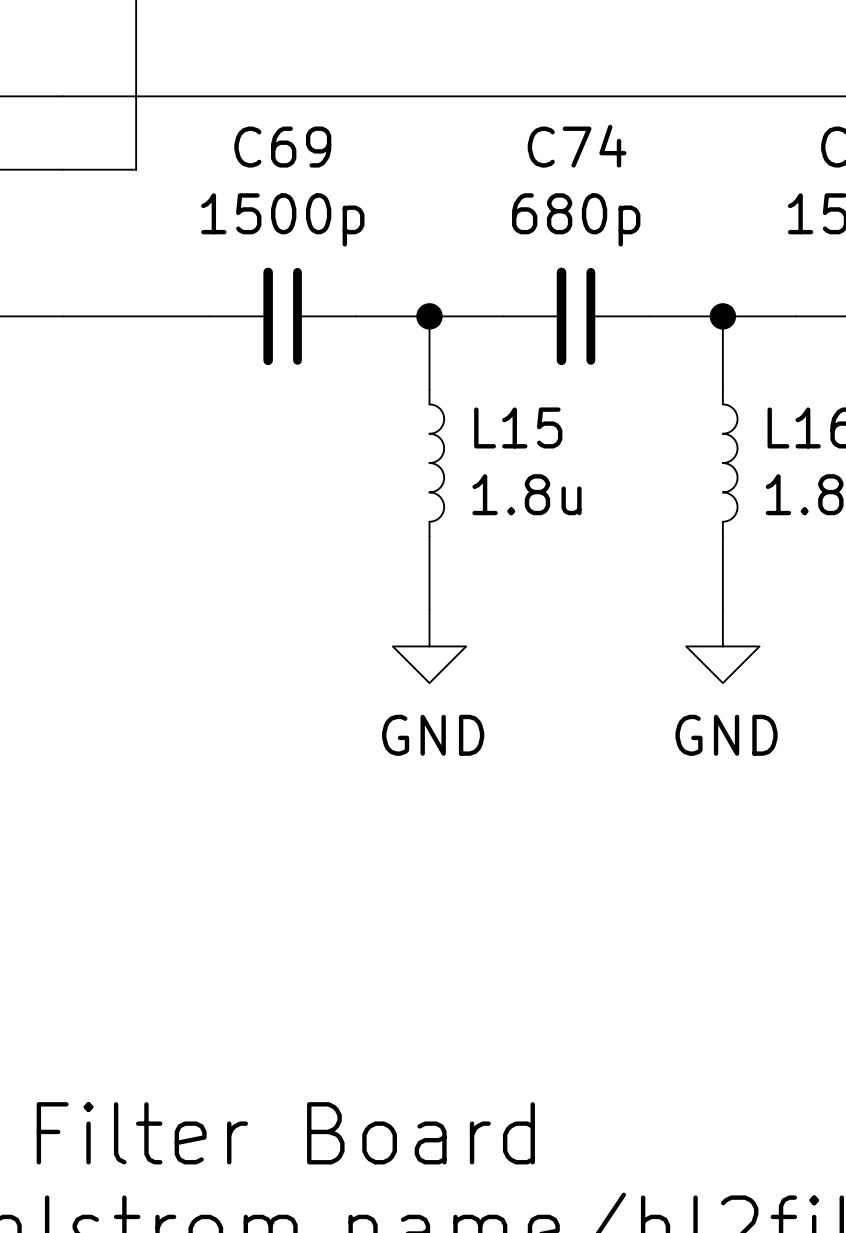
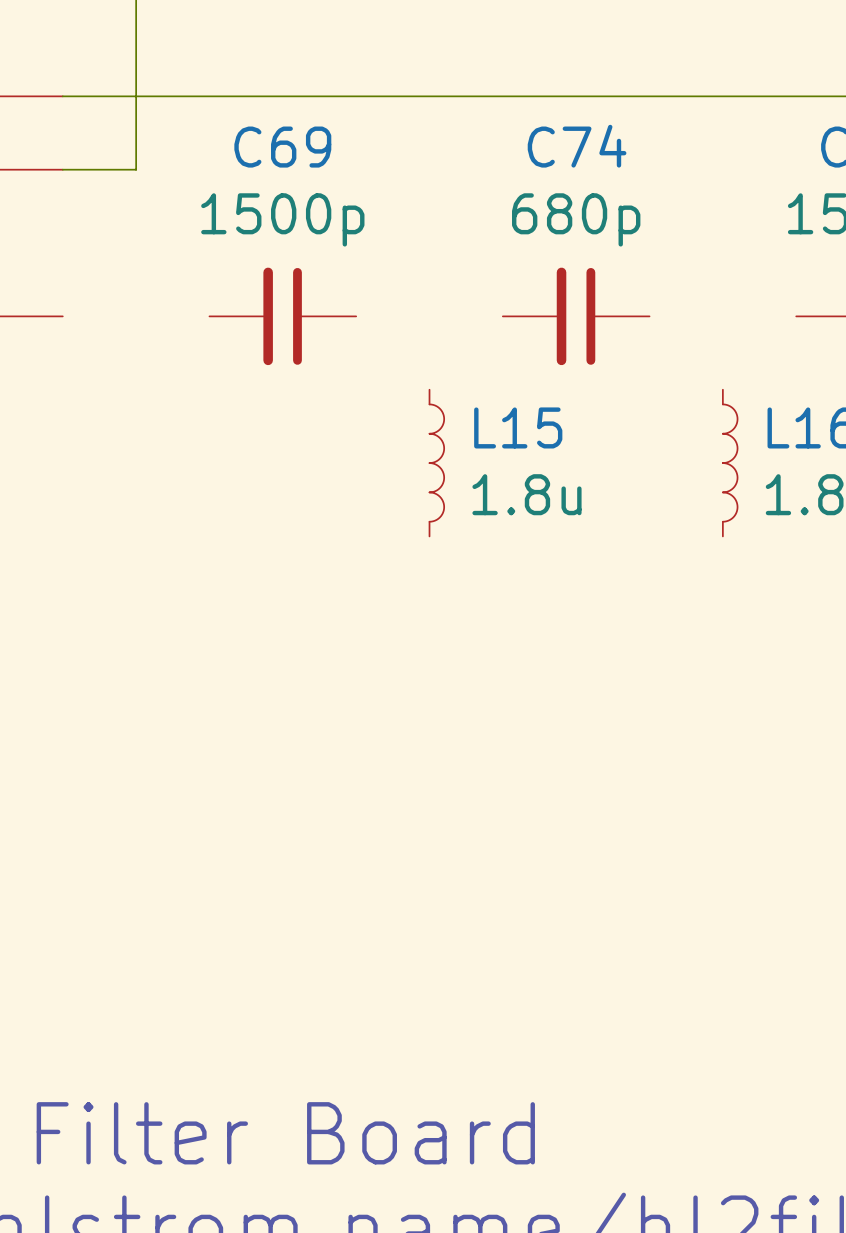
wire: (62, 316) (209, 316) -> none
wire: (356, 316) (502, 316) -> none
wire: (429, 316) (429, 389) -> none
junction: (429, 316) -> none
wire: (649, 316) (796, 316) -> none
wire: (722, 316) (722, 389) -> none
junction: (722, 316) -> none
wire: (429, 536) (429, 609) -> none
wire: (722, 536) (722, 609) -> none
power symbol: GND (429, 646) -> none
power symbol: GND (722, 646) -> none

